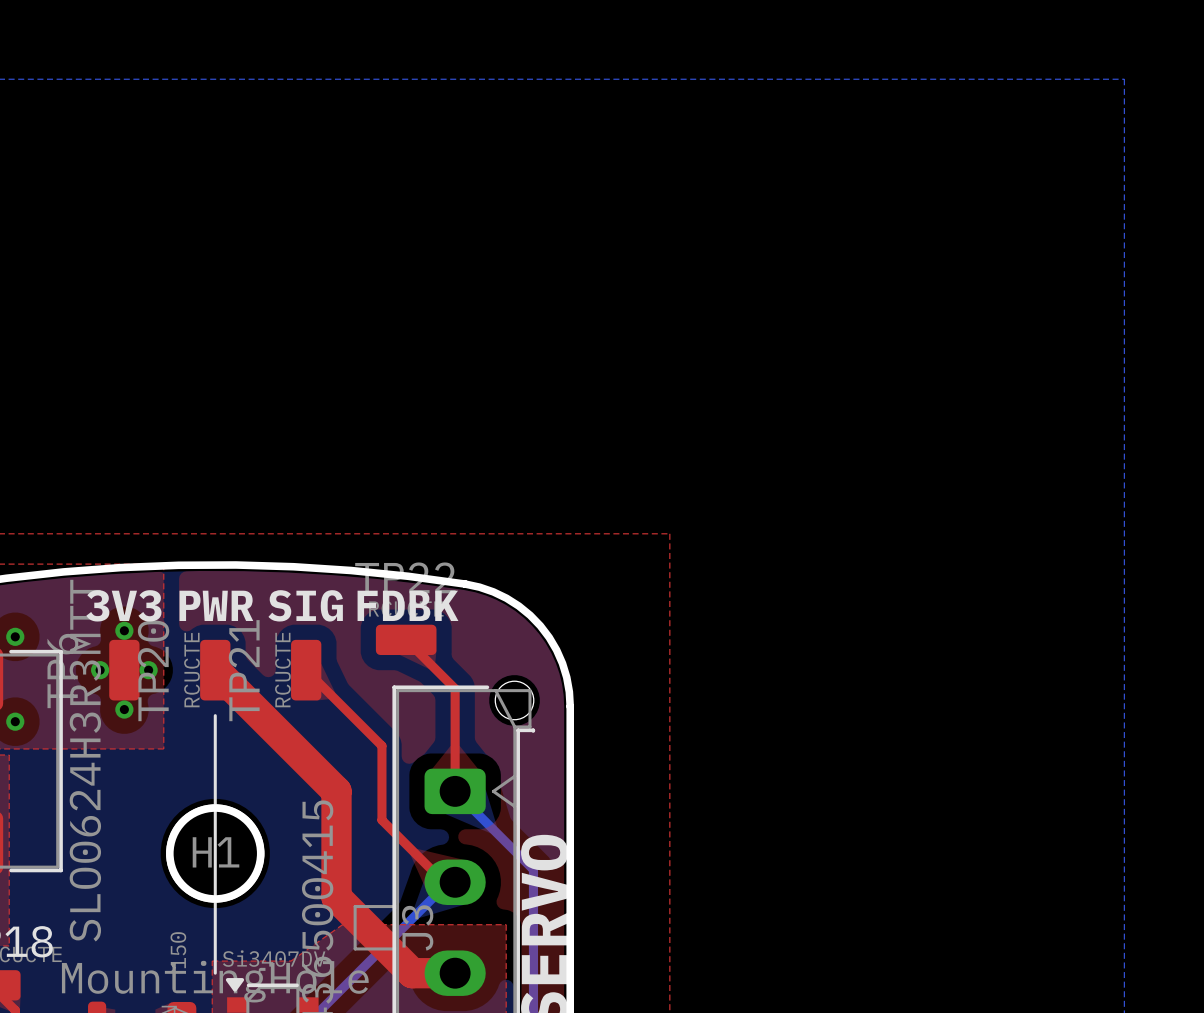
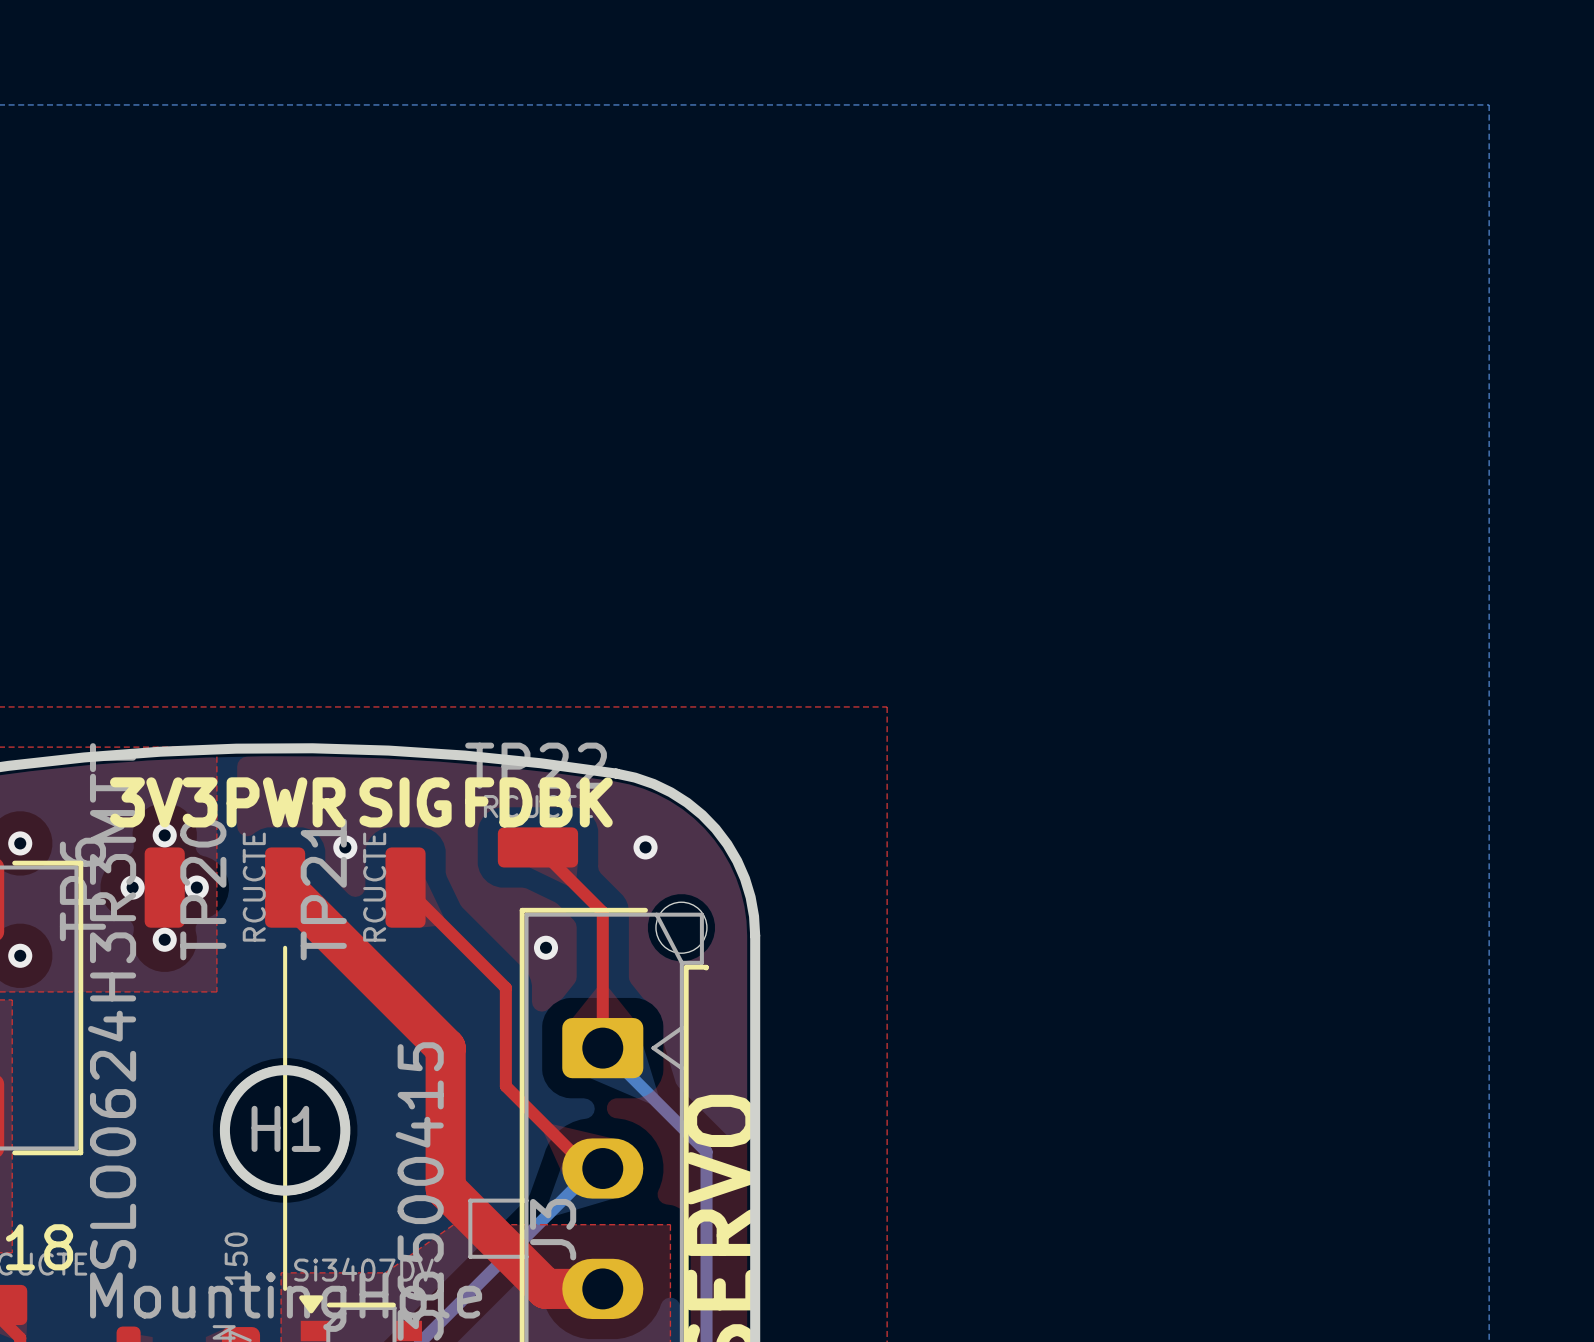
via: none -> (345, 847)
via: none -> (645, 847)
via: none -> (545, 947)

